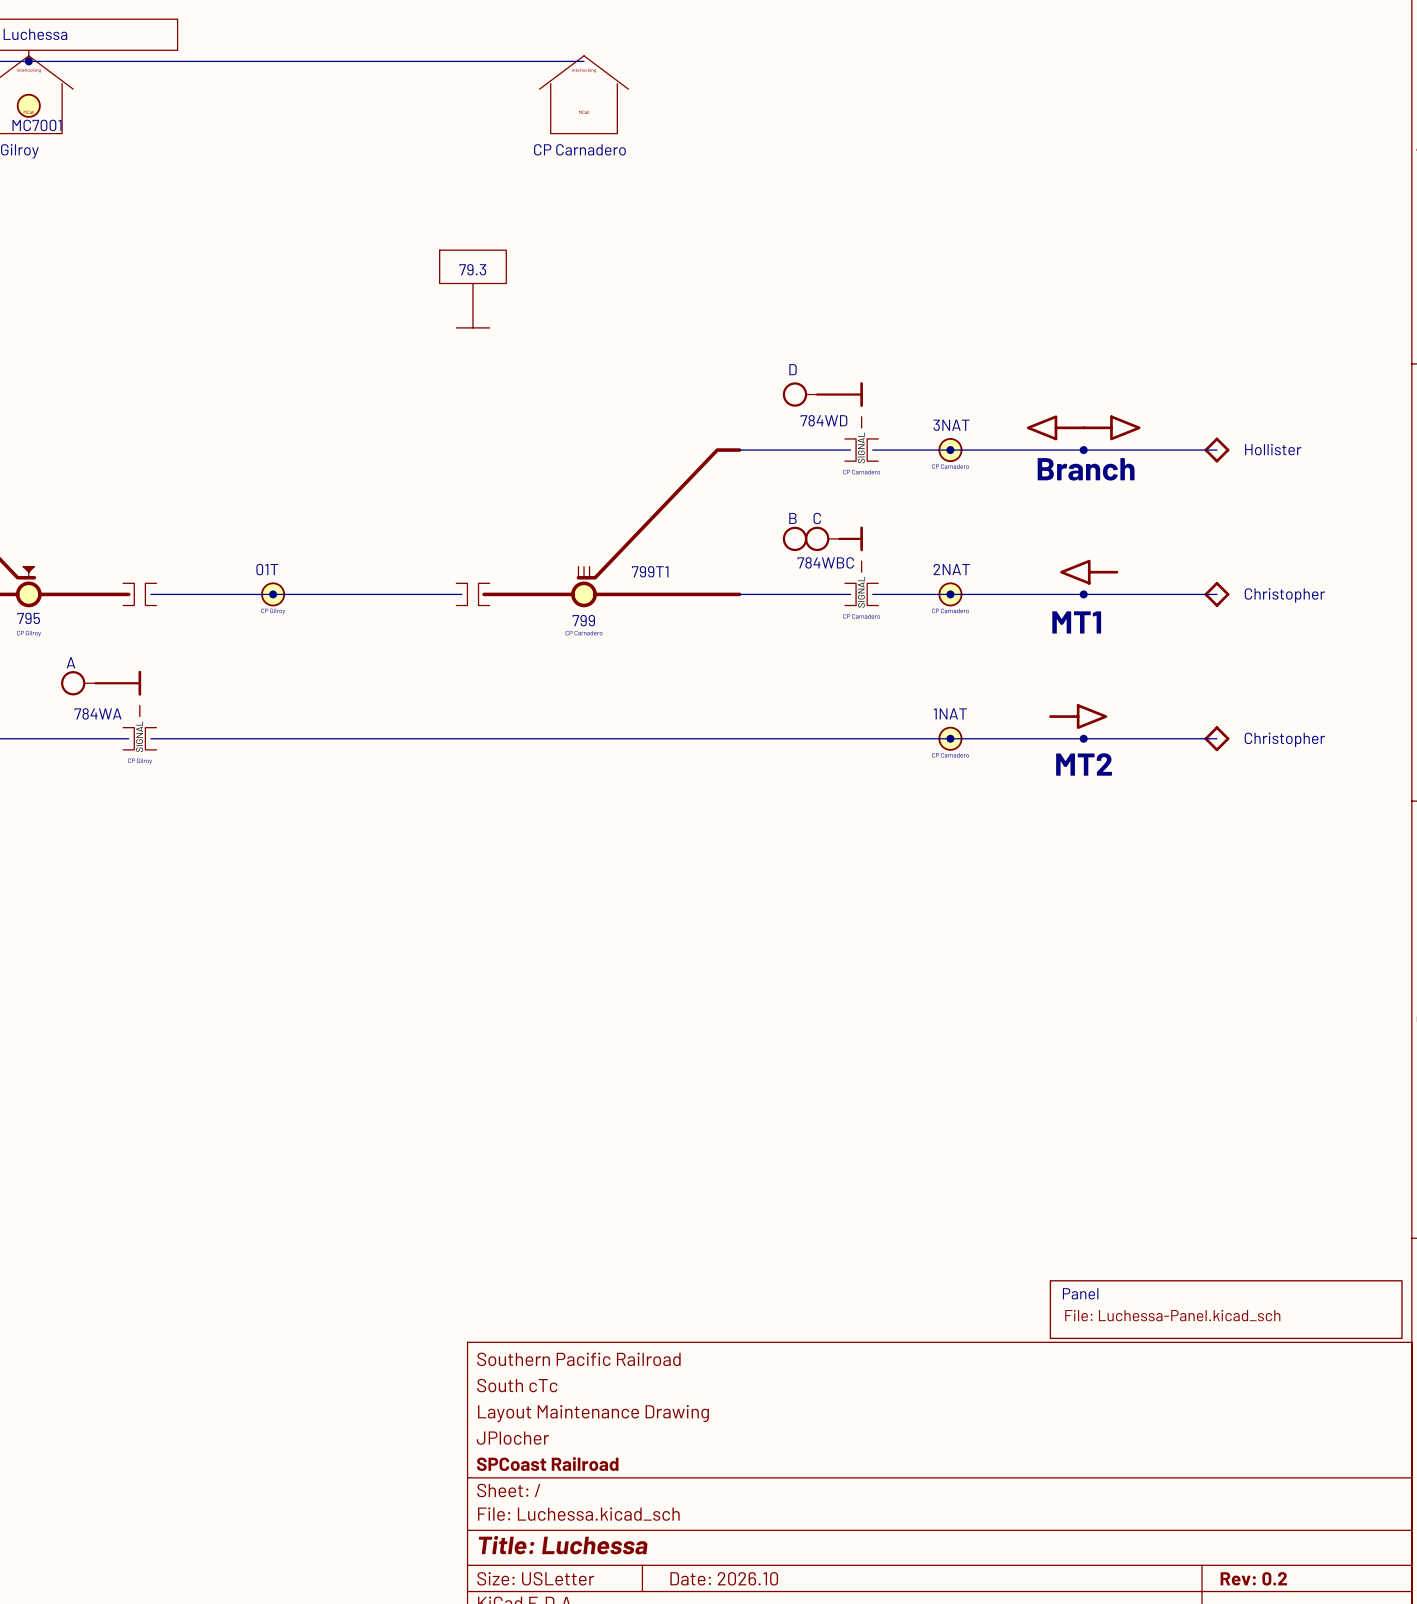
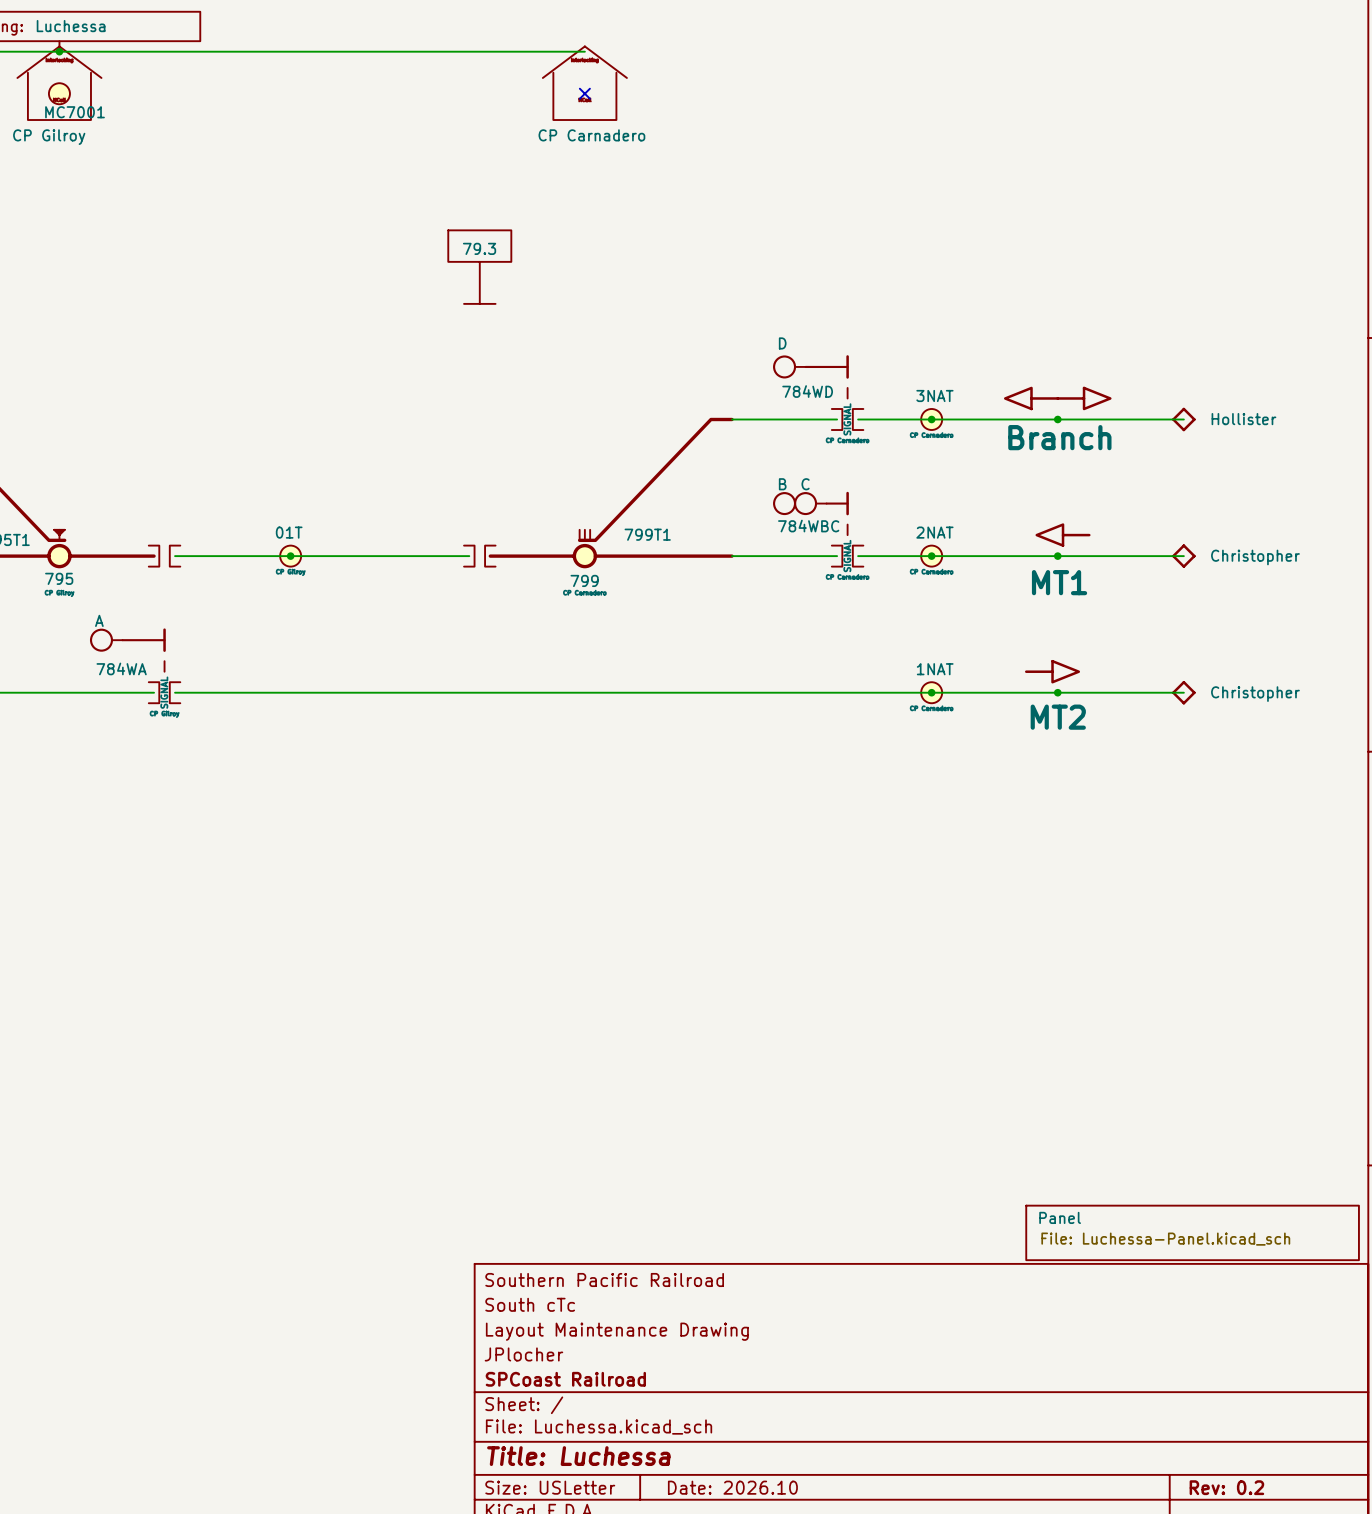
no-connect mark: none -> (584, 93)

